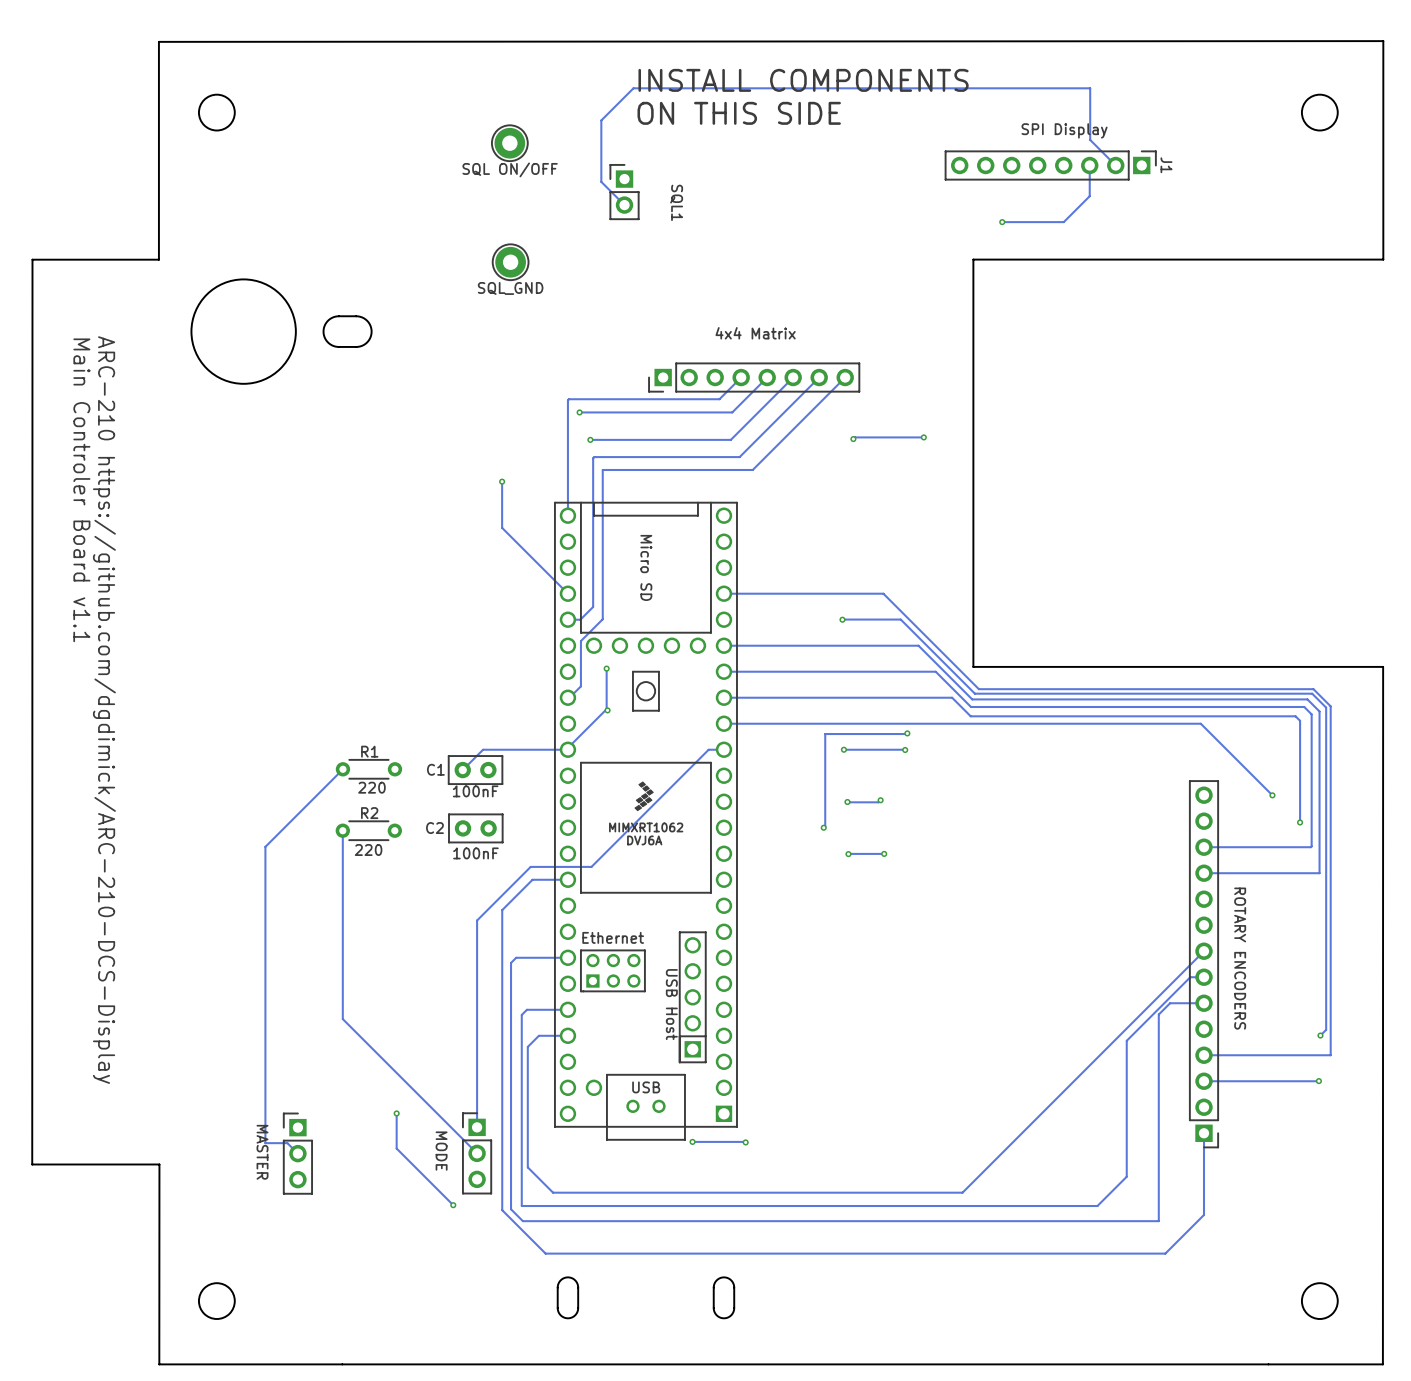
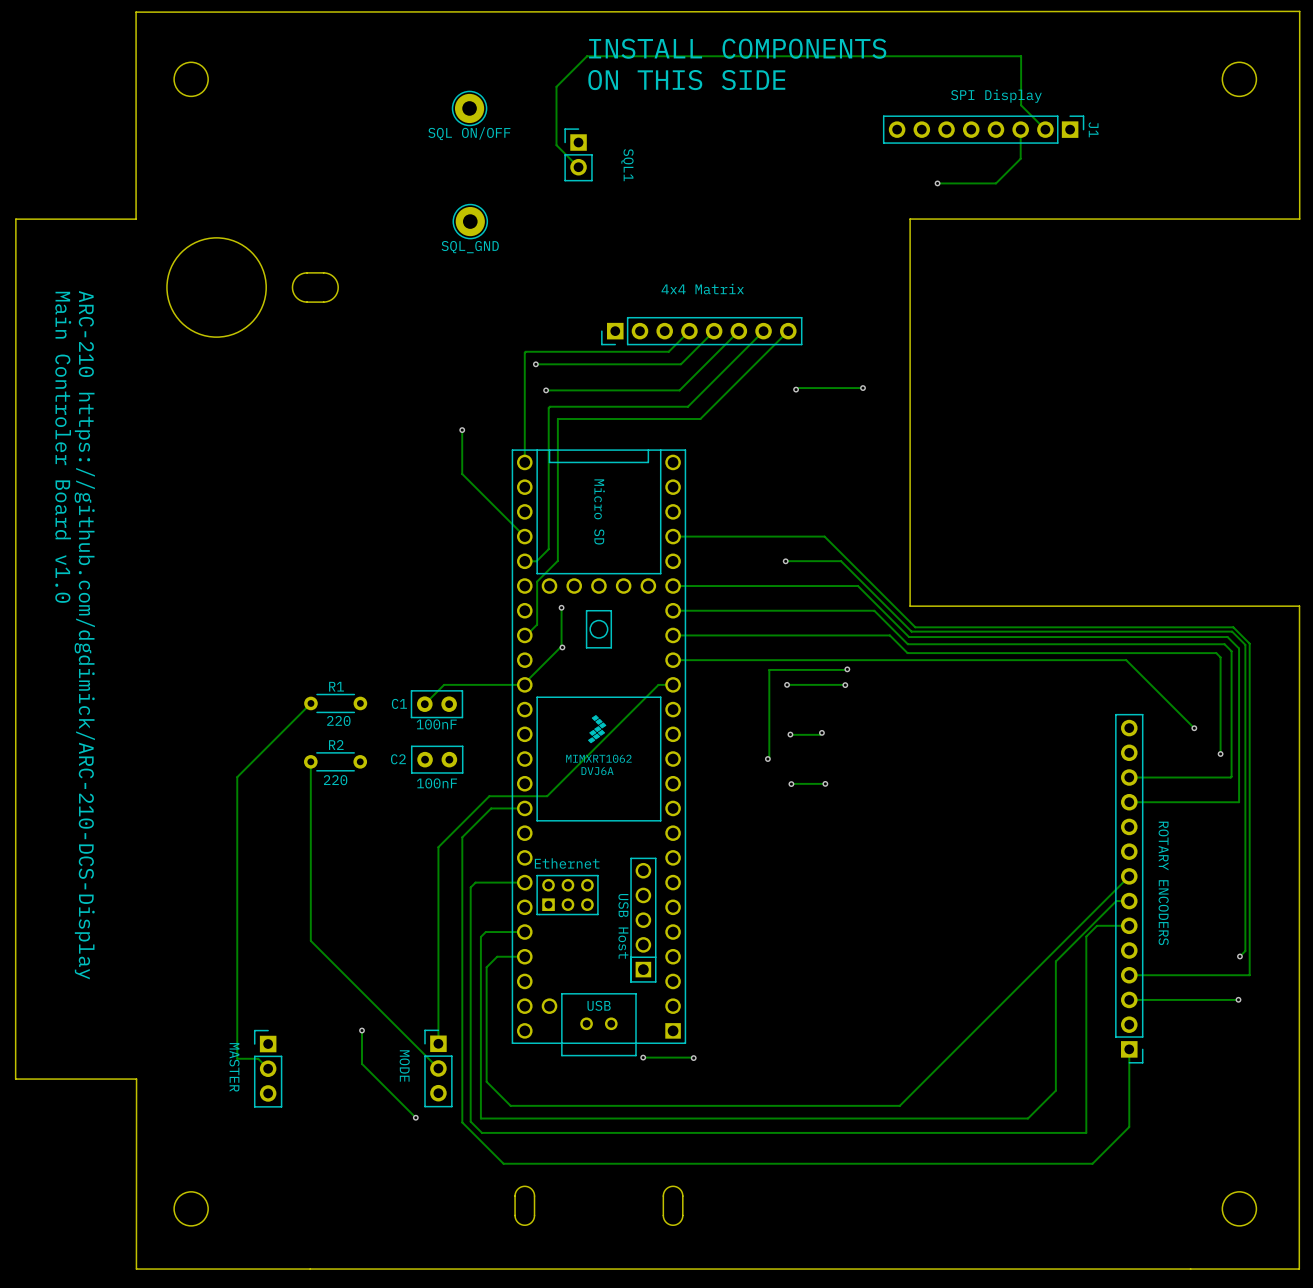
text: Main Controler Board v1.1 (81, 490) -> Main Controler Board v1.0 (63, 447)

